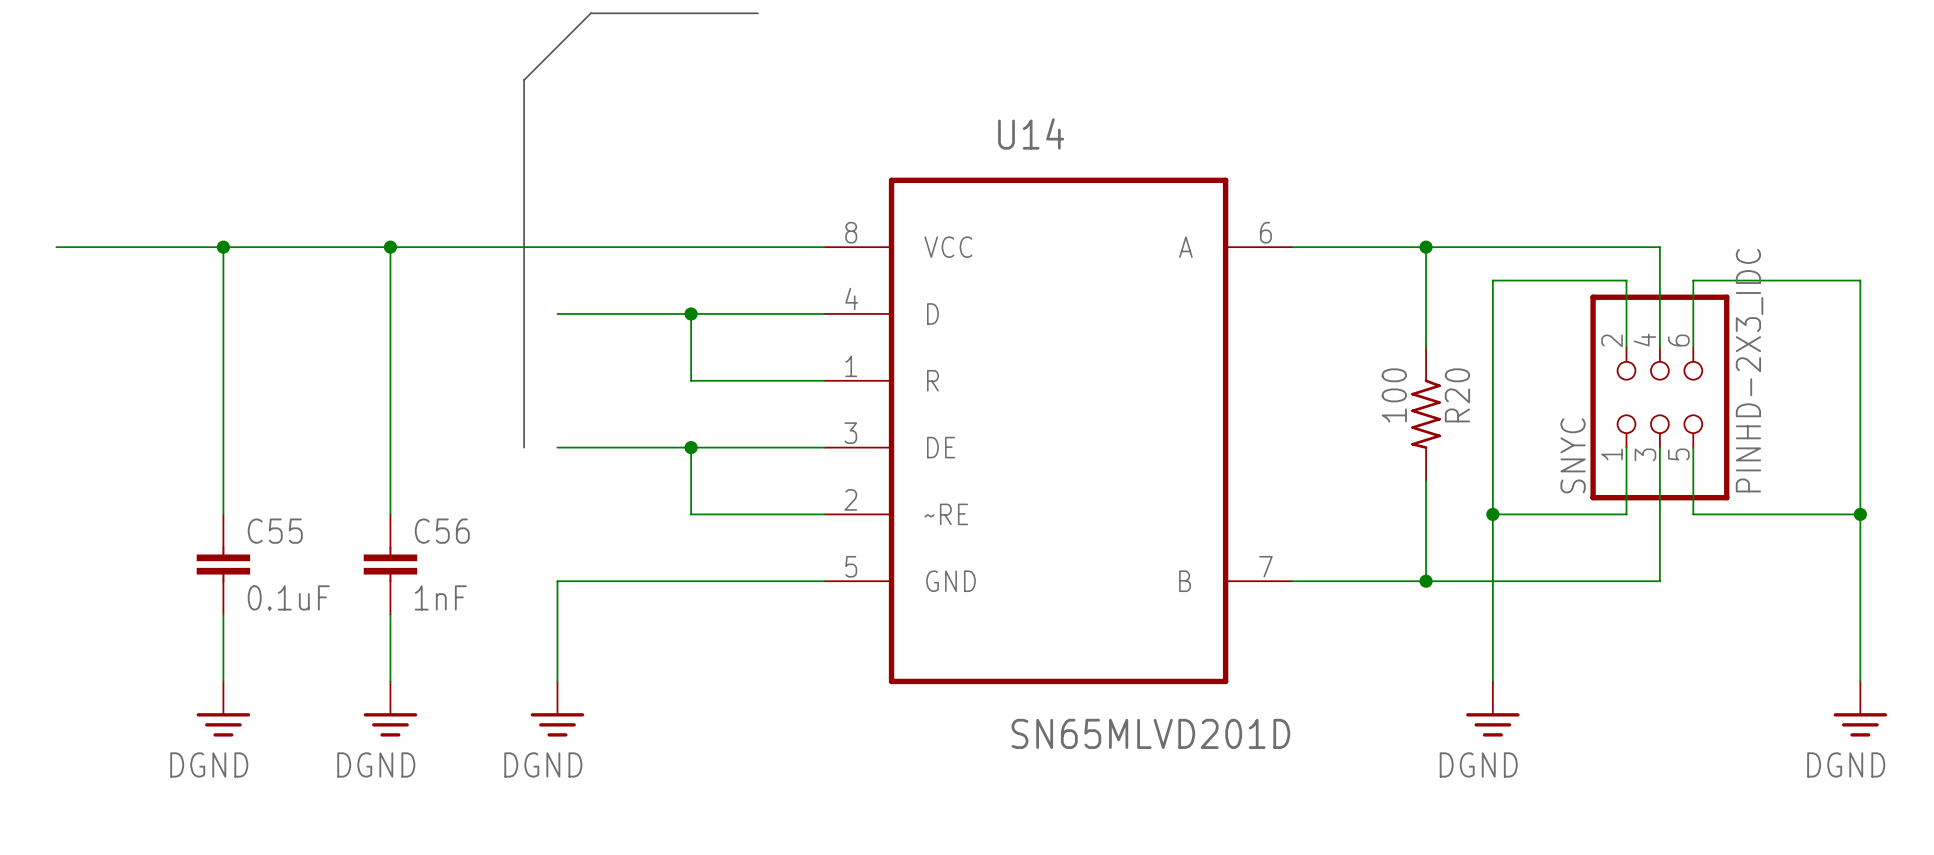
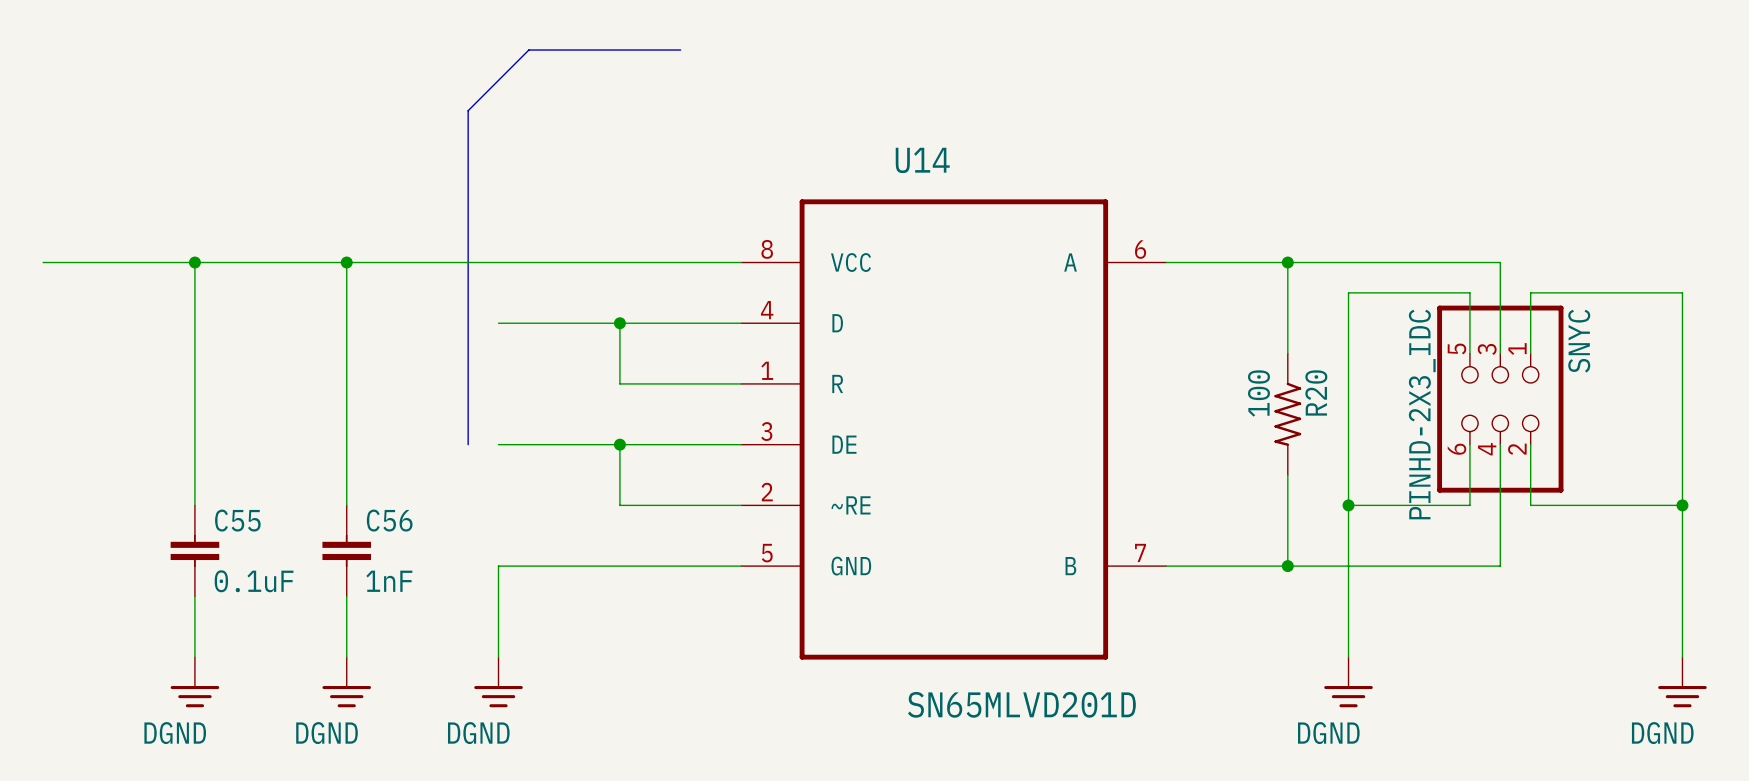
SNYC rotation: 0° (1659, 397) -> 180° (1500, 399)

